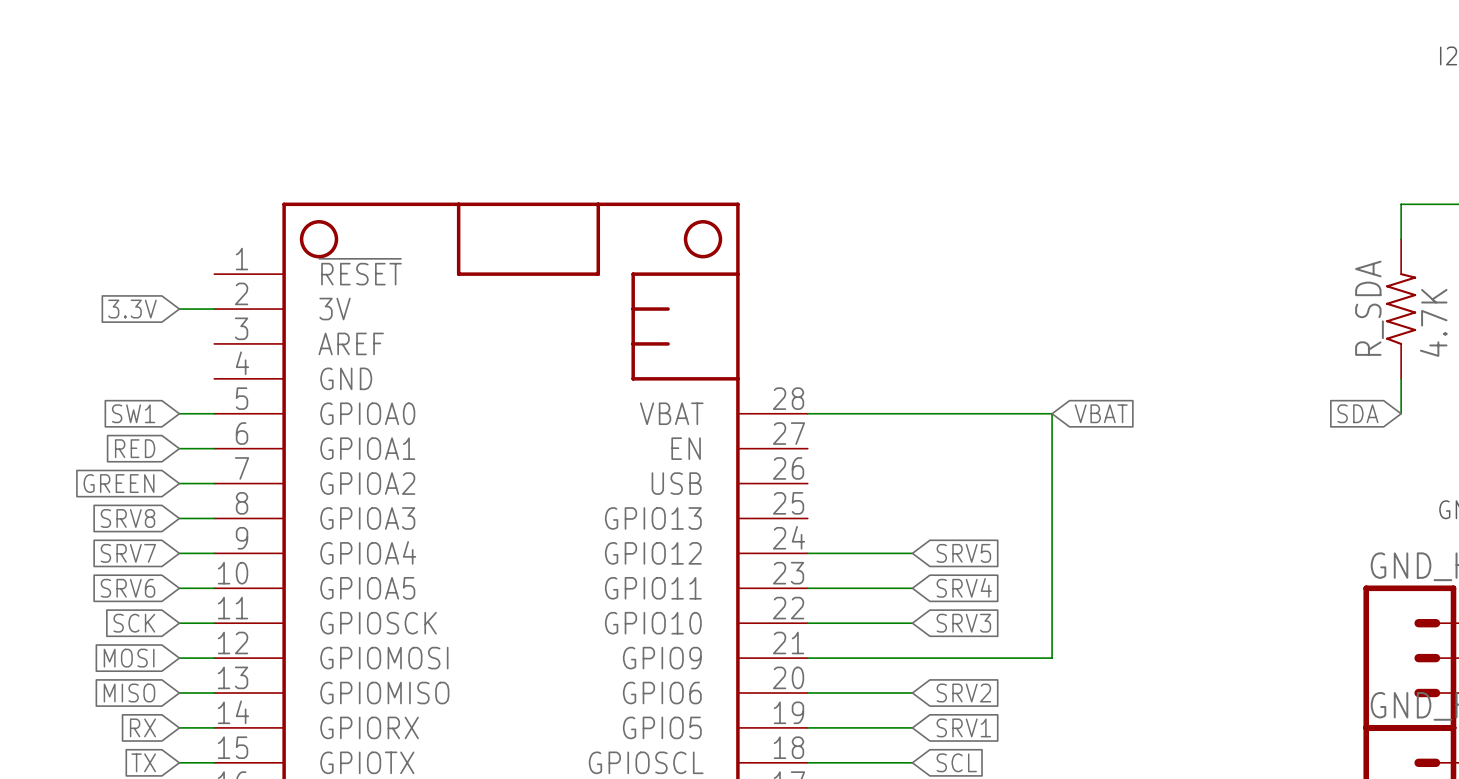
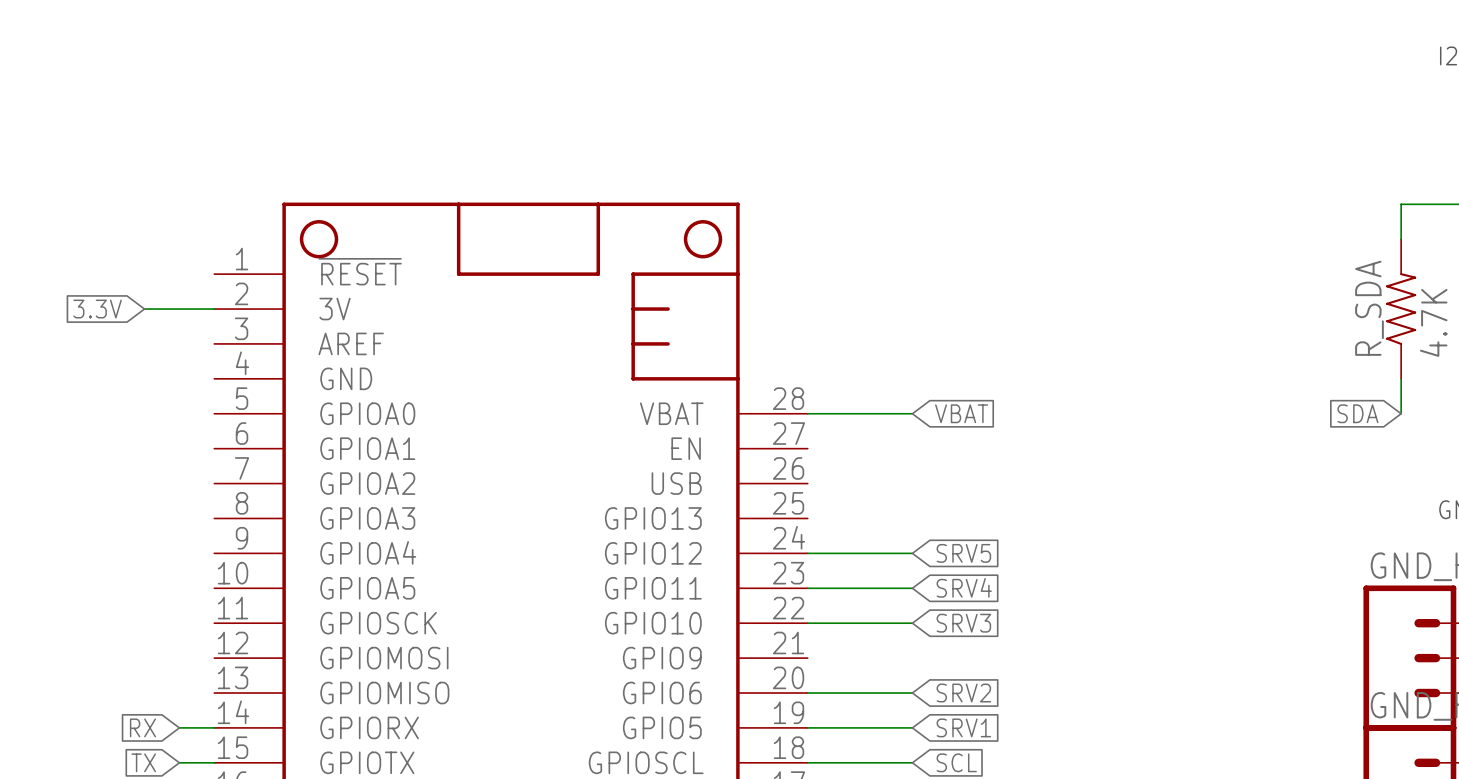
global label position: 3.3V (132, 309) -> 3.3V (97, 309)
global label: SW1 (133, 413) -> none
wire: (179, 413) (214, 413) -> (144, 309) (179, 309)
wire: (912, 413) (1052, 413) (1052, 658) (807, 658) -> none
global label position: VBAT (1101, 413) -> VBAT (961, 413)
global label: RED (135, 448) -> none
wire: (179, 448) (214, 448) -> none
global label: GREEN (119, 483) -> none
wire: (179, 483) (214, 483) -> none
global label: SRV8 (127, 518) -> none
wire: (179, 518) (214, 518) -> none
global label: SRV7 (128, 553) -> none
wire: (179, 553) (214, 553) -> none
global label: SRV6 (127, 588) -> none
wire: (179, 588) (214, 588) -> none
global label: SCK (134, 623) -> none
wire: (179, 623) (214, 623) -> none
global label: MOSI (129, 658) -> none
wire: (179, 658) (214, 658) -> none
global label: MISO (129, 693) -> none
wire: (179, 693) (214, 693) -> none

